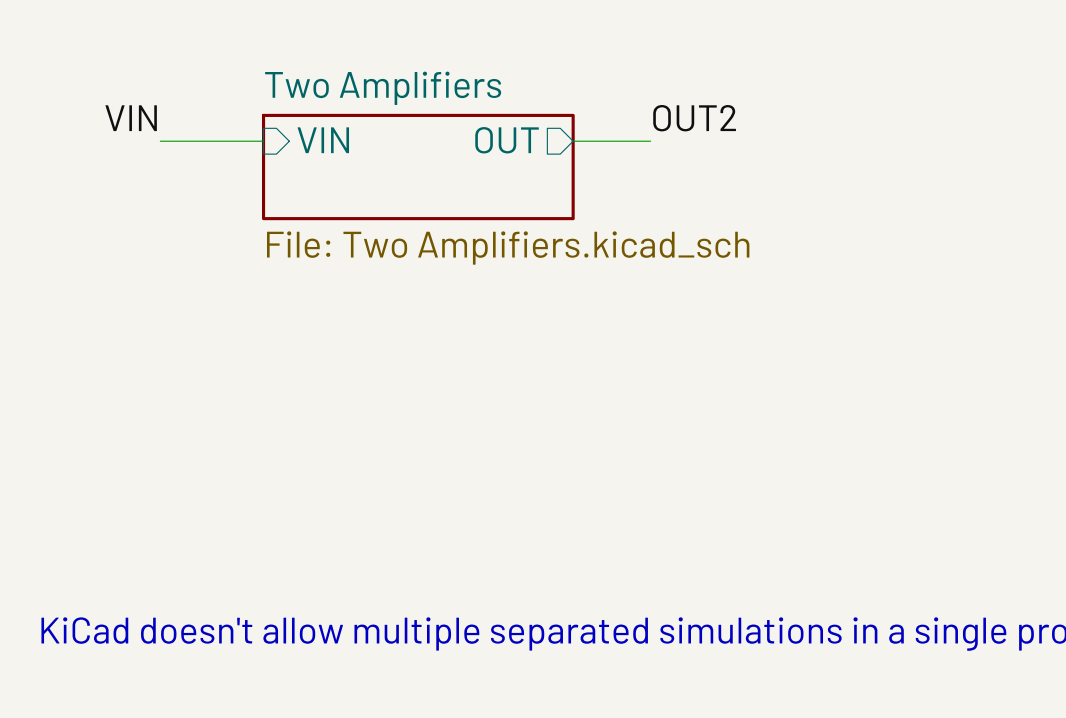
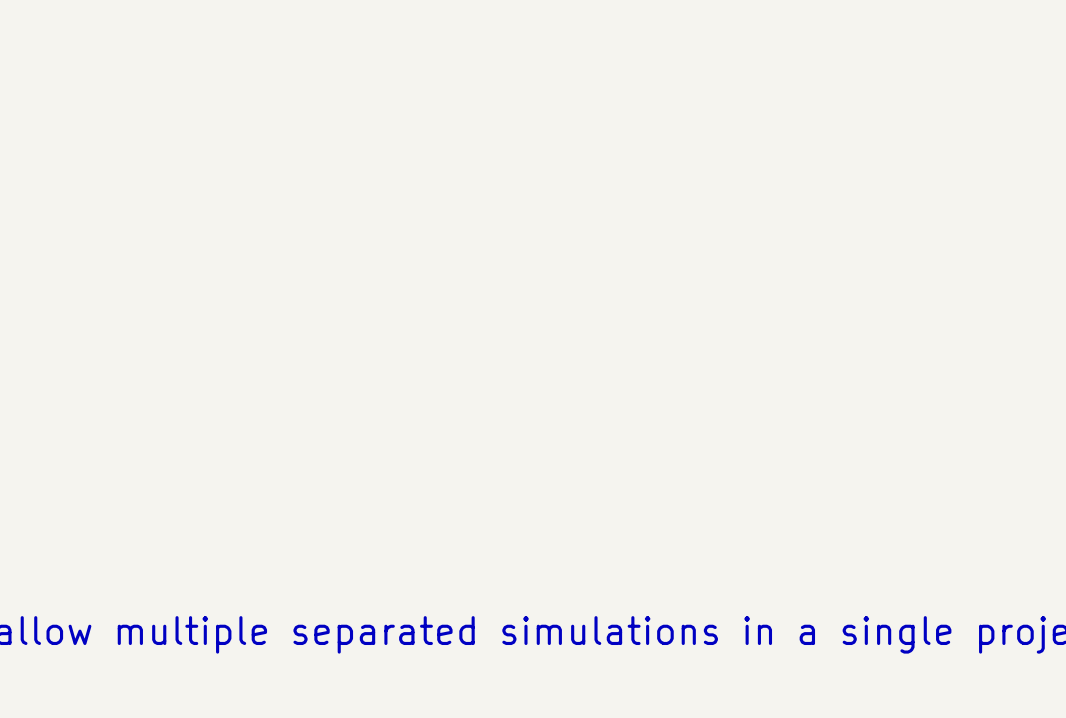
label: VIN (131, 118) -> none
label: OUT2 (694, 118) -> none
sheet pin: VIN (323, 140) -> none
sheet pin: OUT (507, 140) -> none
wire: (160, 141) (263, 141) -> none
wire: (573, 141) (650, 141) -> none
sheet Two Amplifiers: File: Two Amplifiers.kicad_sch (418, 167) -> none

